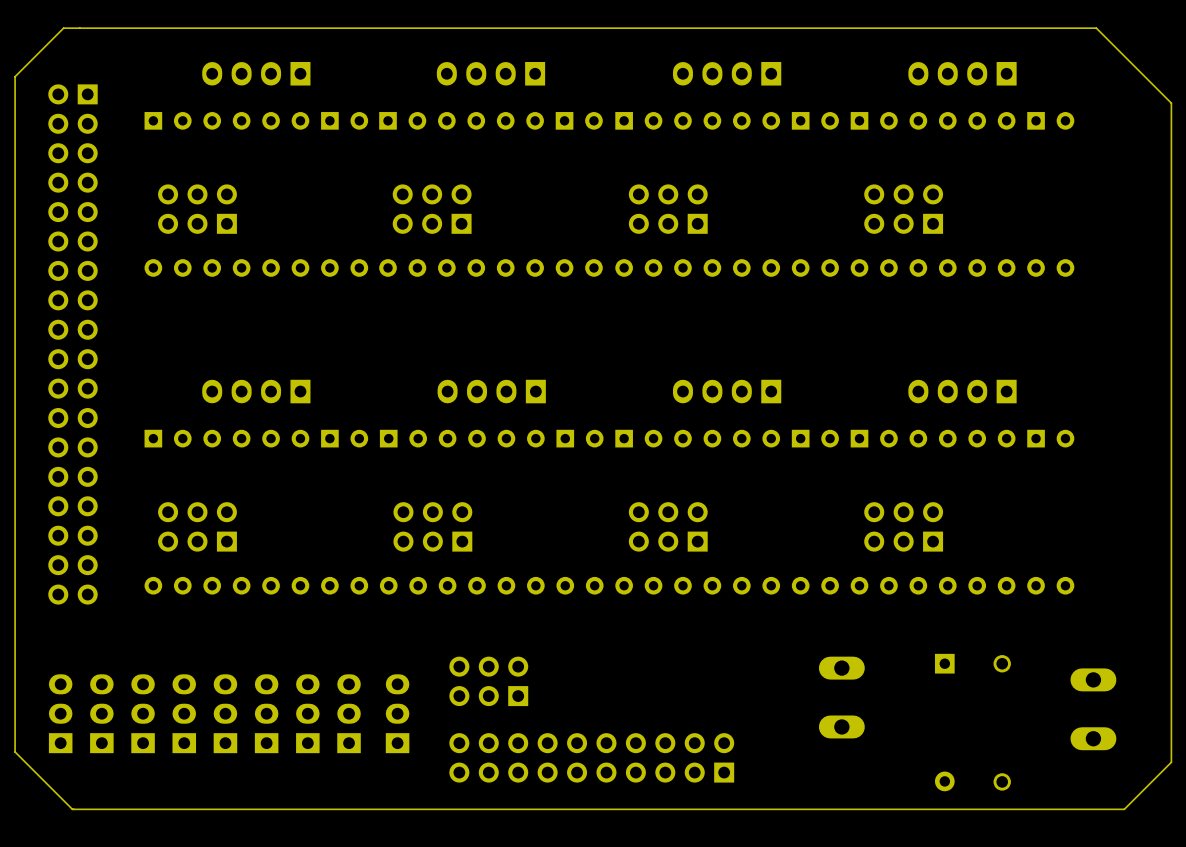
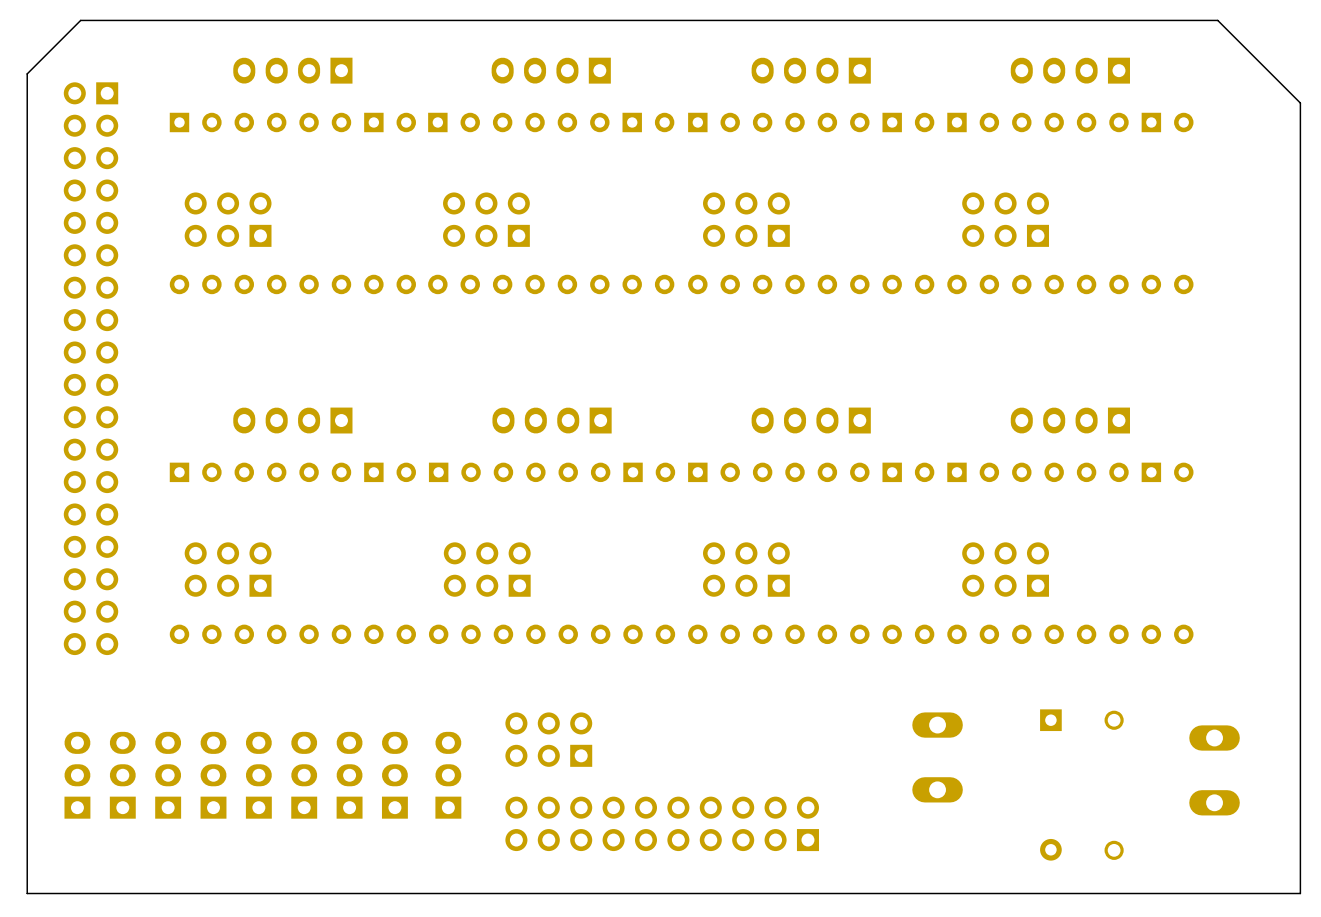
board edge: (15, 751) (72, 809) (1124, 809) (1171, 762) -> (27, 817) (27, 893) (1300, 893) (1300, 828)

